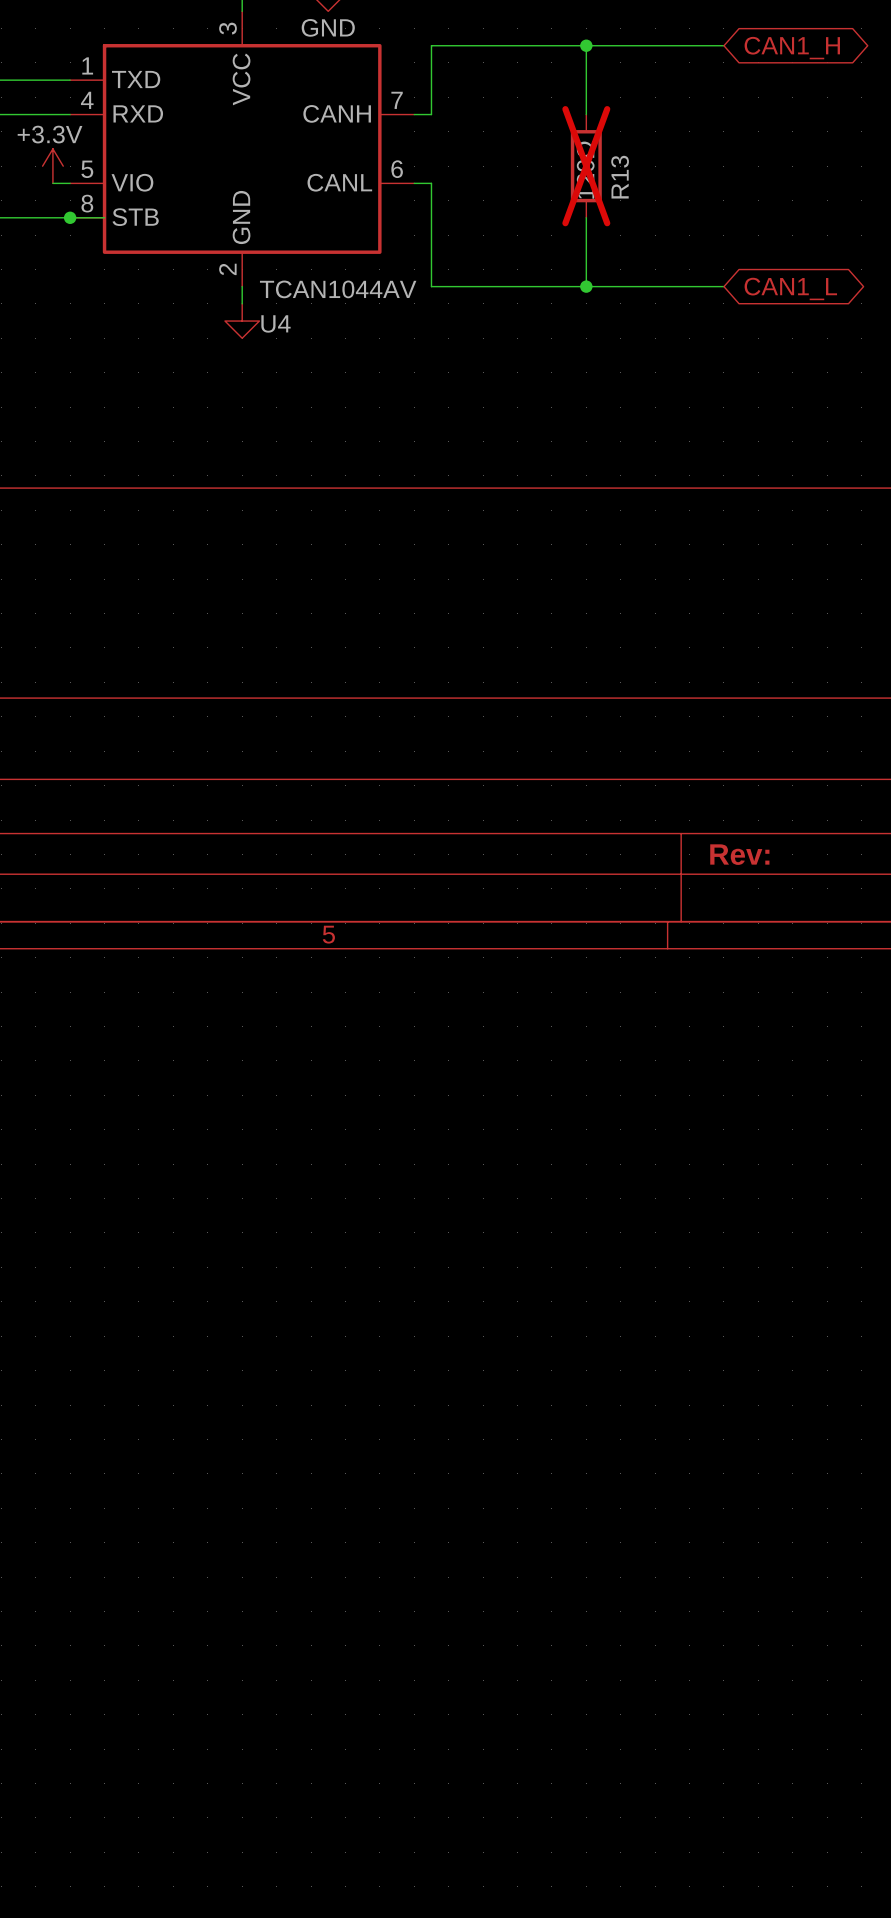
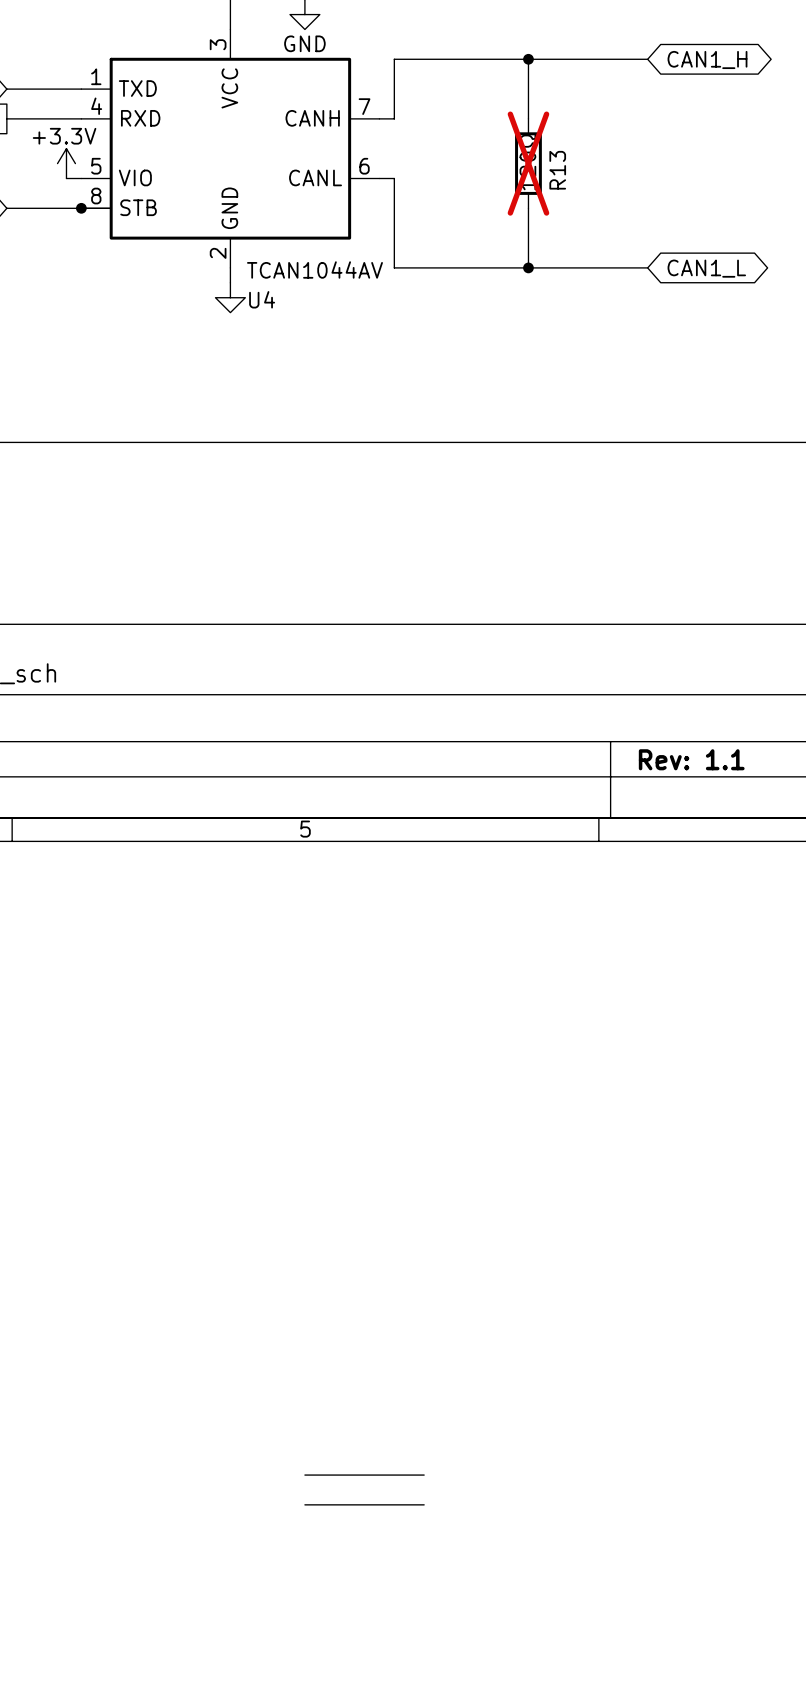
title block: Rev: (739, 854) -> Rev: 1.1 (691, 759)
wire: none -> (304, 1475) (424, 1475)
wire: none -> (304, 1504) (424, 1504)

